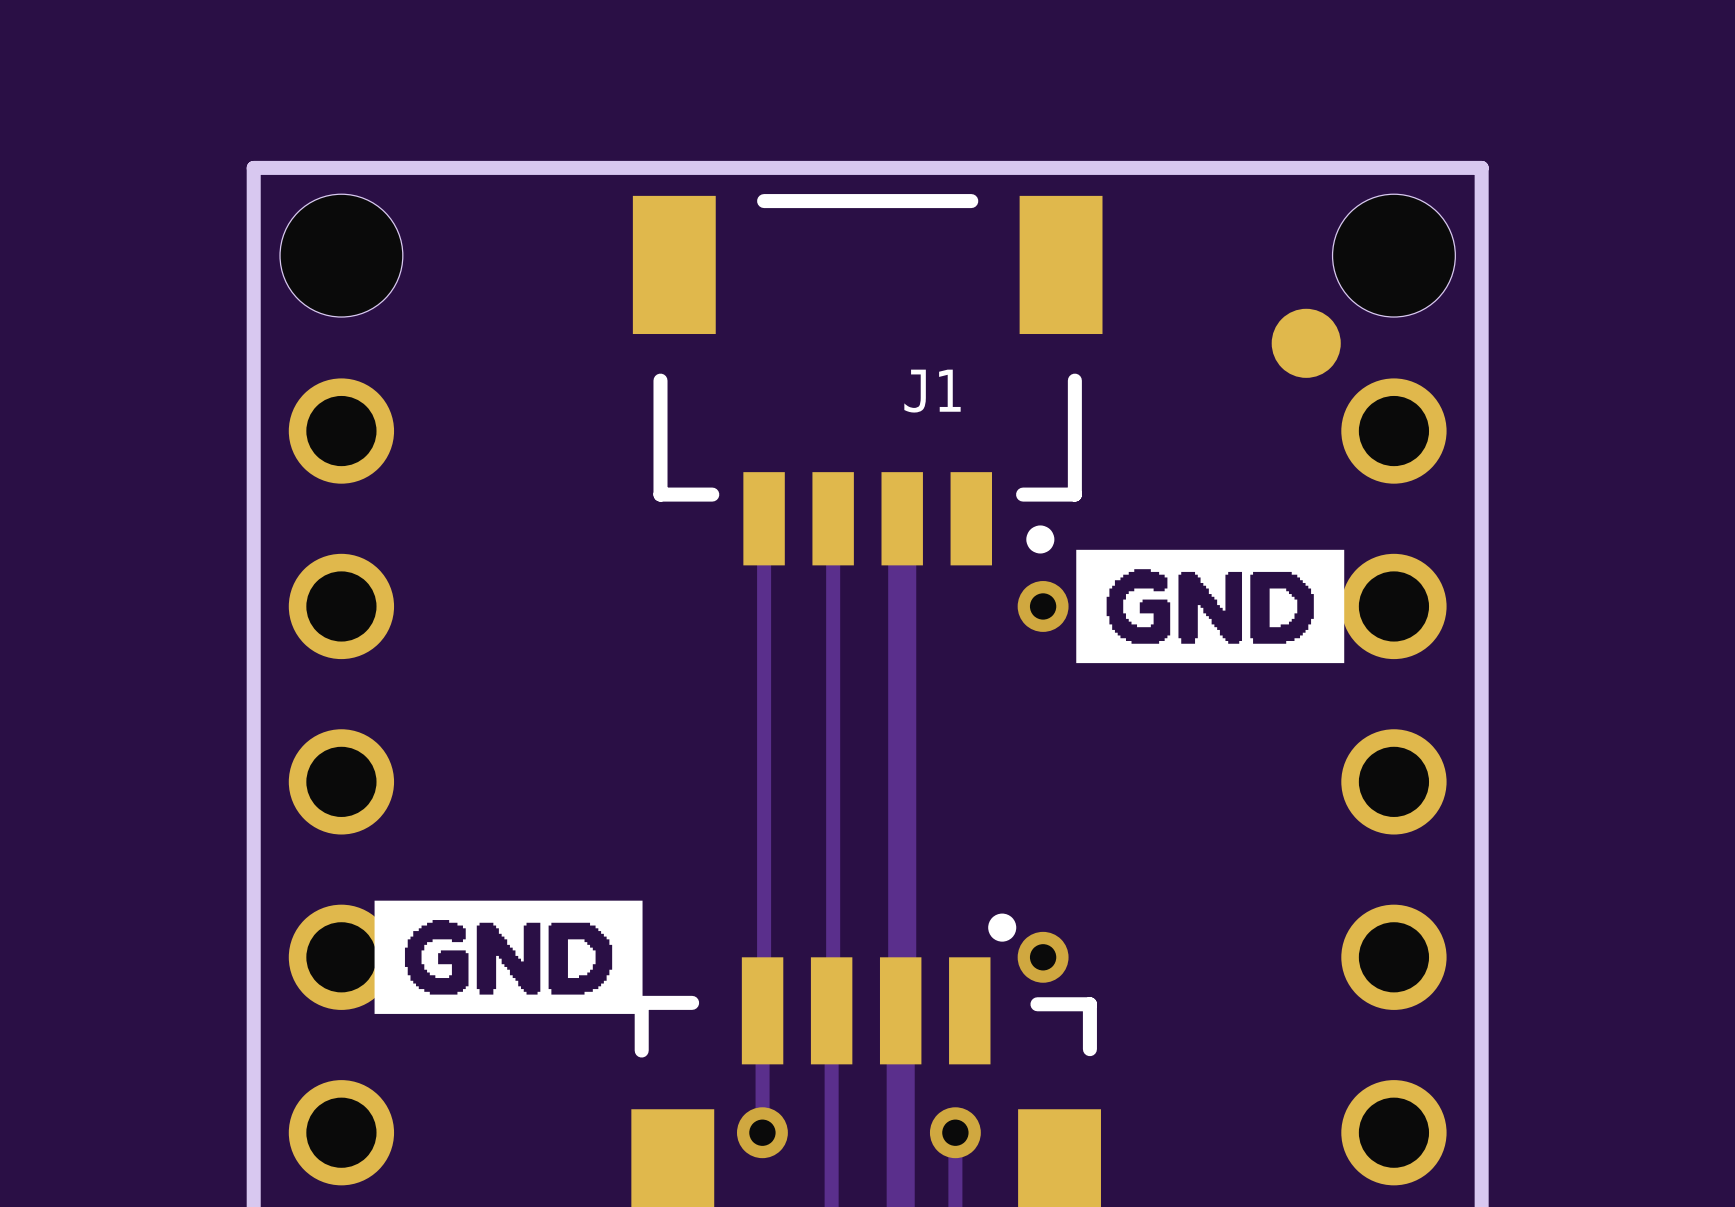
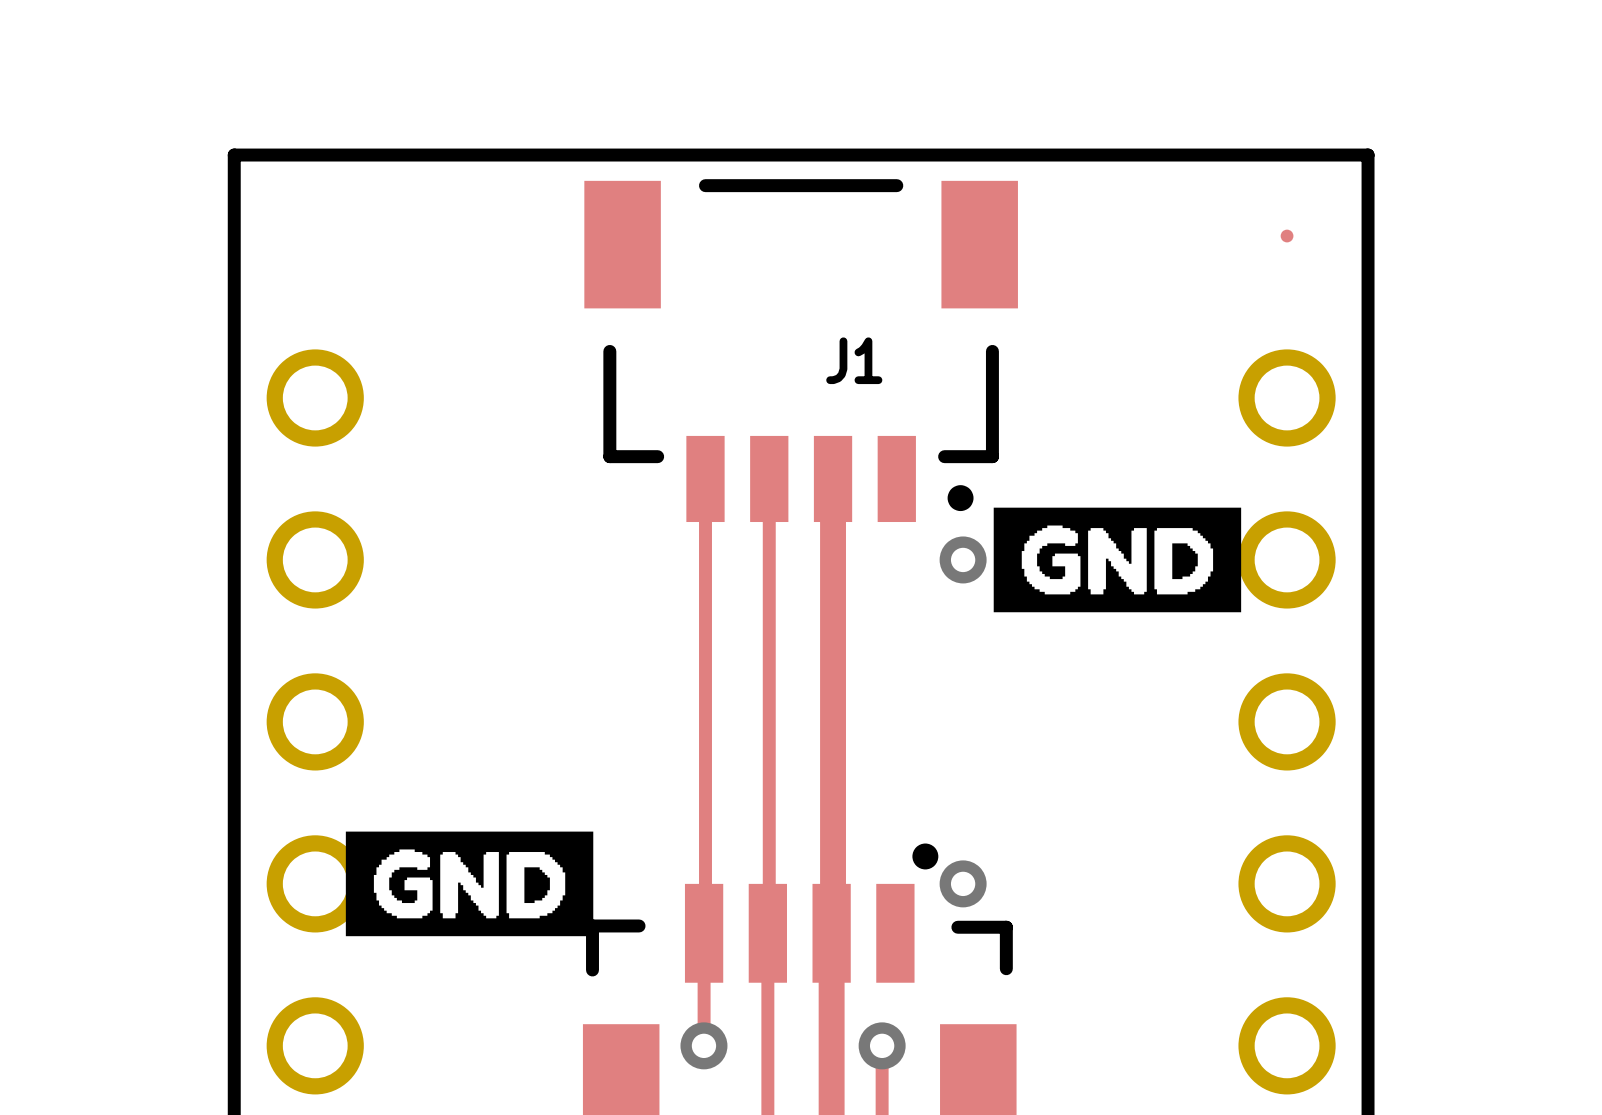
hole: (341, 255) -> none
hole: (1393, 255) -> none
part: none -> (1287, 236)
part: (1306, 343) -> none

